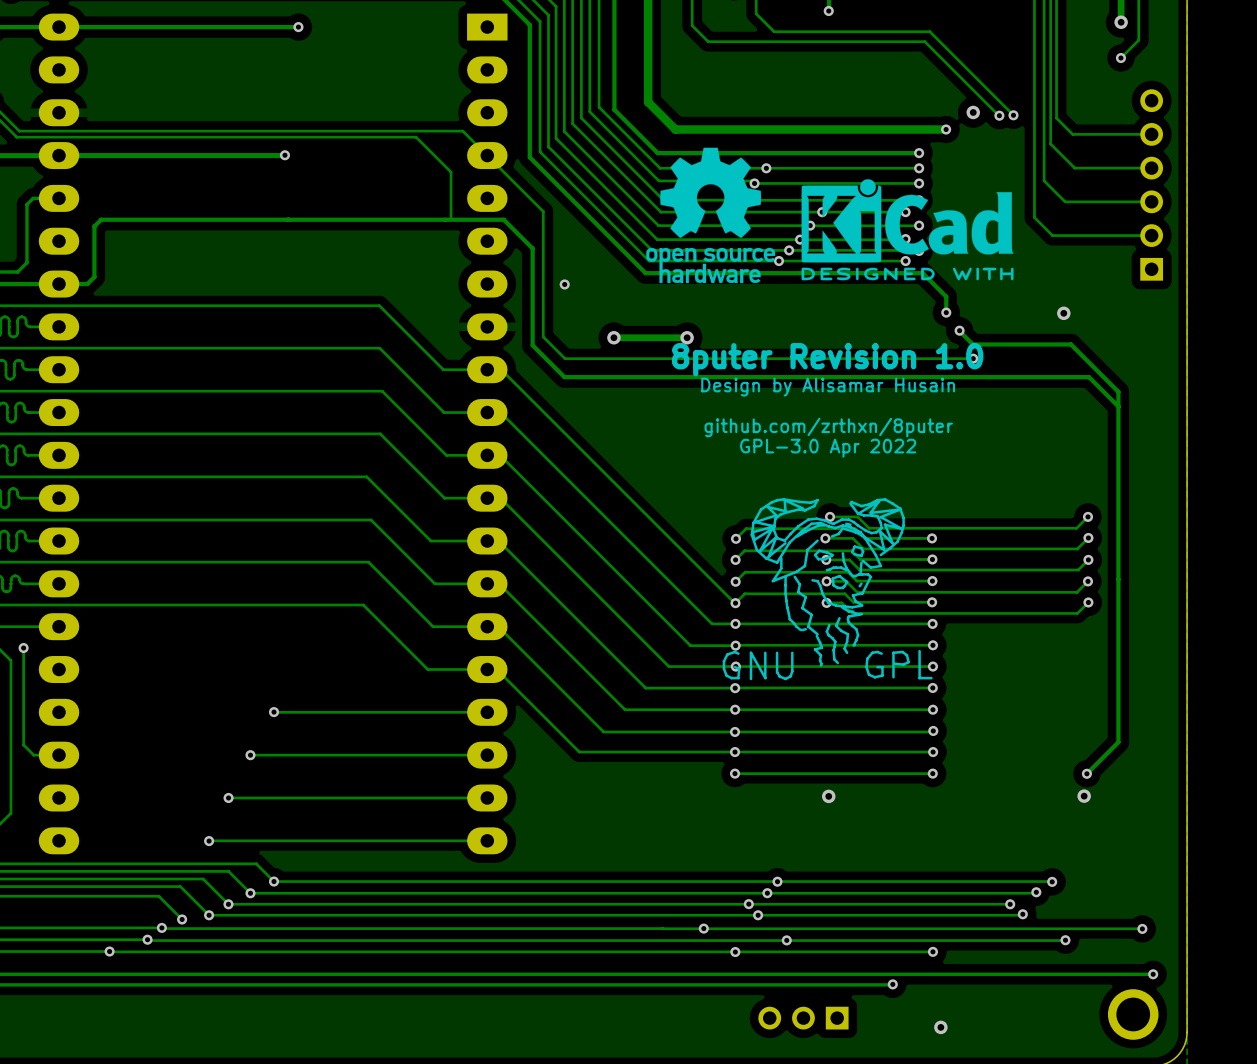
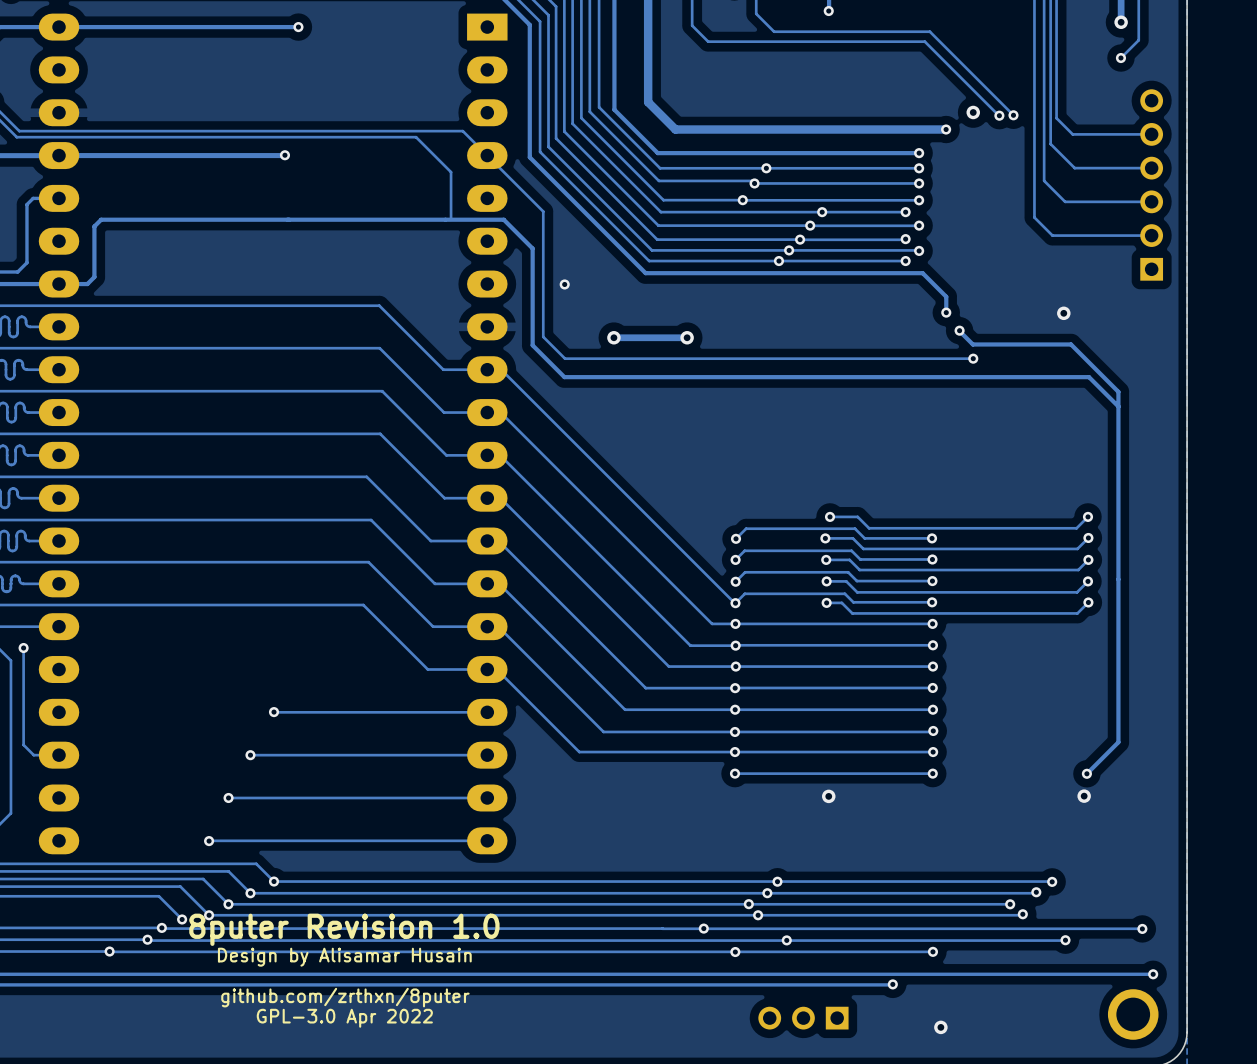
drawing: [646, 147, 776, 284] -> none
drawing: [801, 179, 1014, 281] -> none
text: 8puter Revision 1.0 (827, 359) -> none
text: Design by Alisamar Husain (828, 387) -> none
text: github.com/zrthxn/8puter (828, 427) -> none
text: GPL-3.0 Apr 2022 (828, 448) -> none
drawing: [722, 498, 933, 681] -> none
text: none -> 8puter Revision 1.0 (344, 929)
text: none -> Design by Alisamar Husain (344, 957)
text: none -> github.com/zrthxn/8puter (345, 997)
text: none -> GPL-3.0 Apr 2022 (344, 1018)

